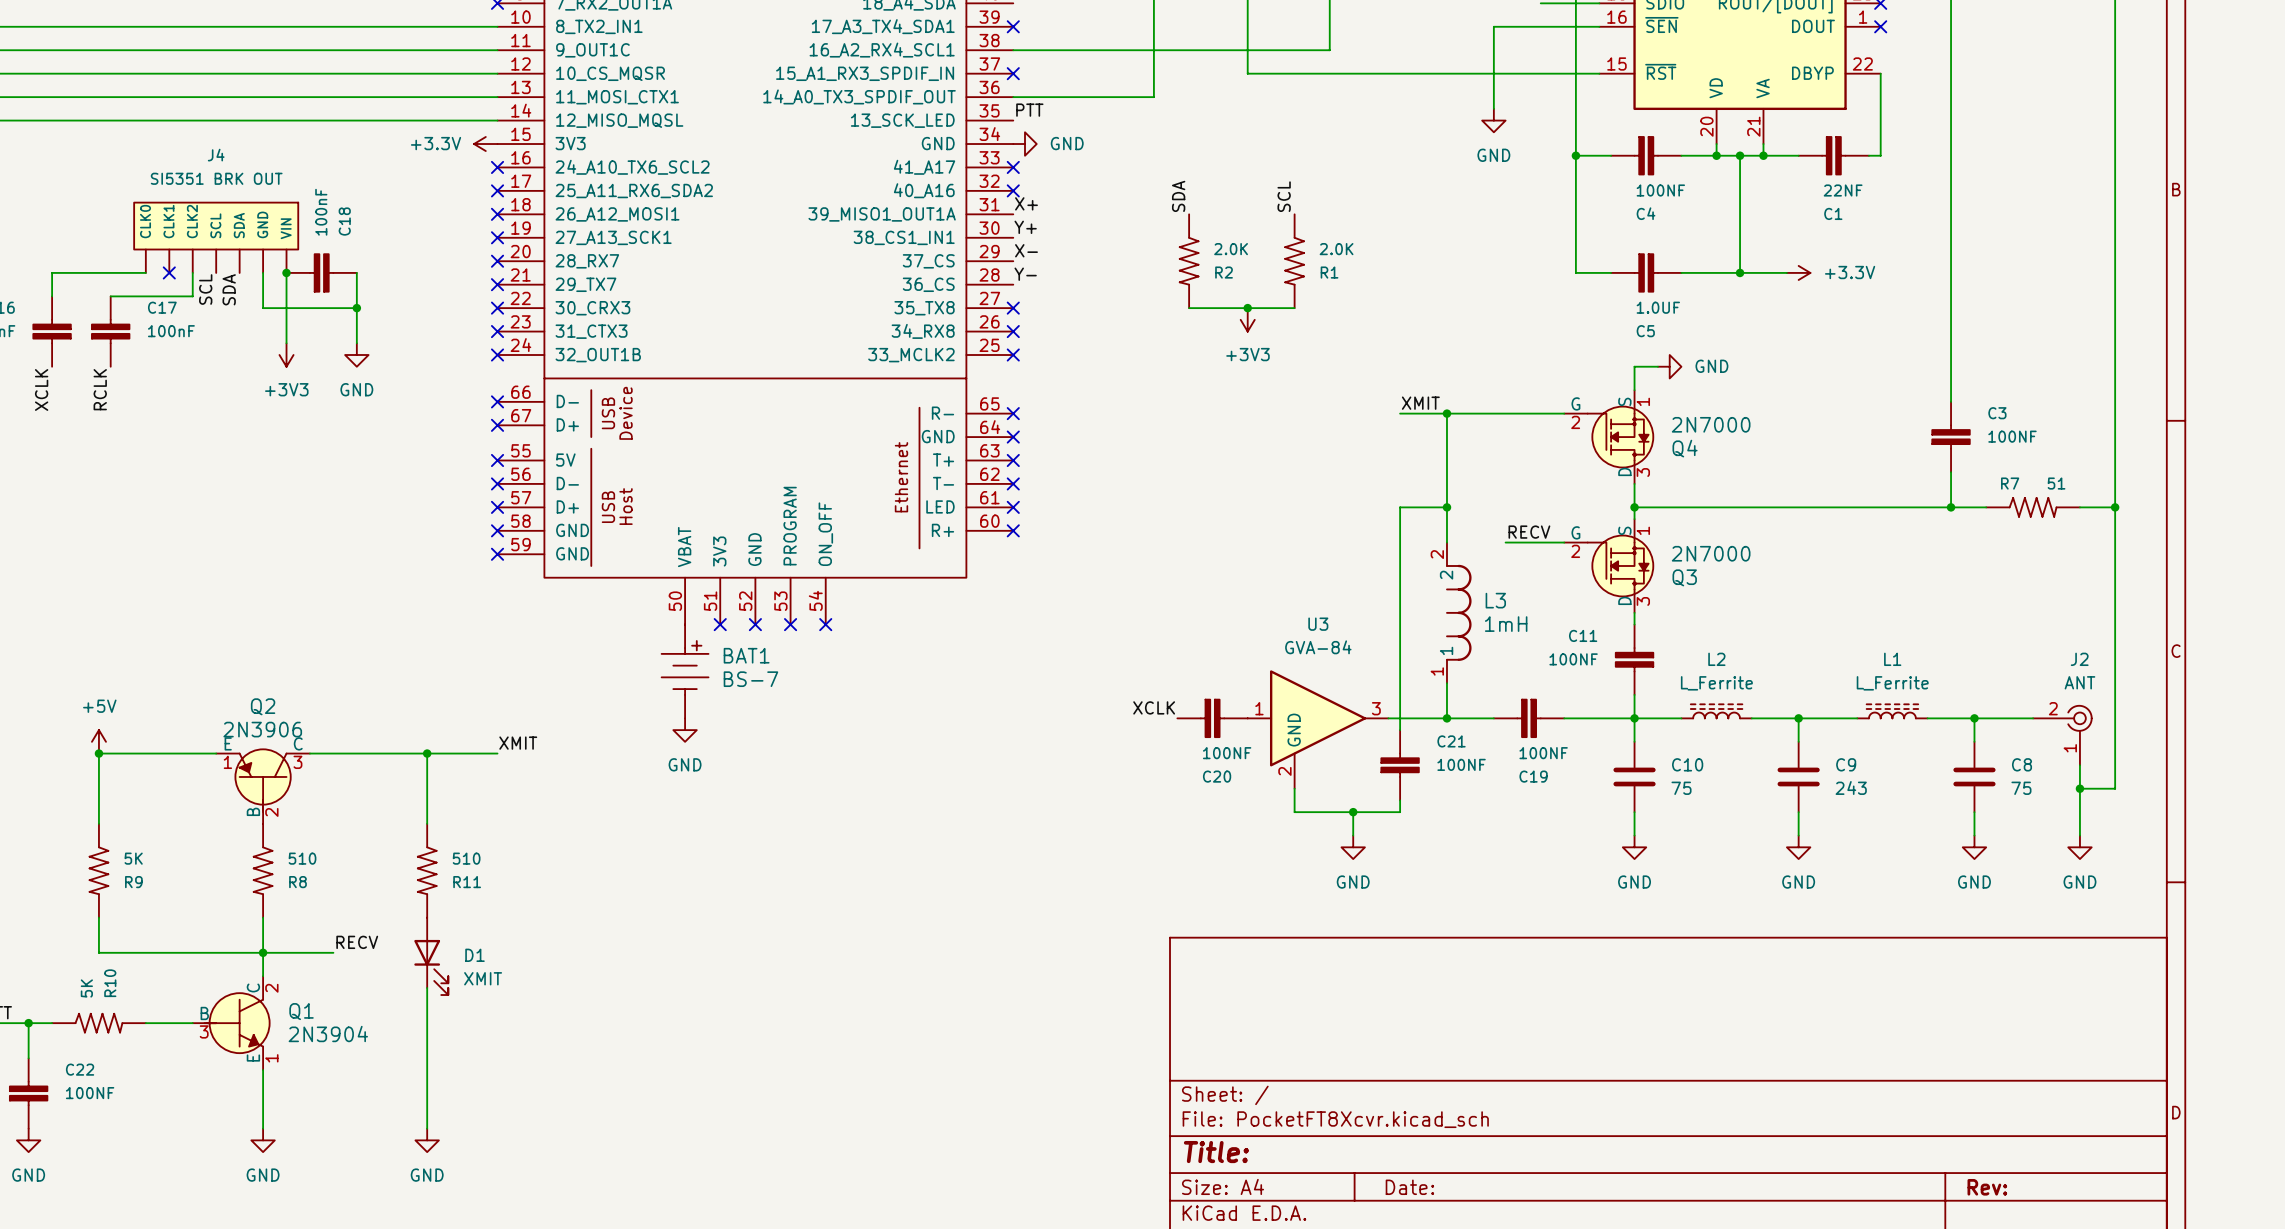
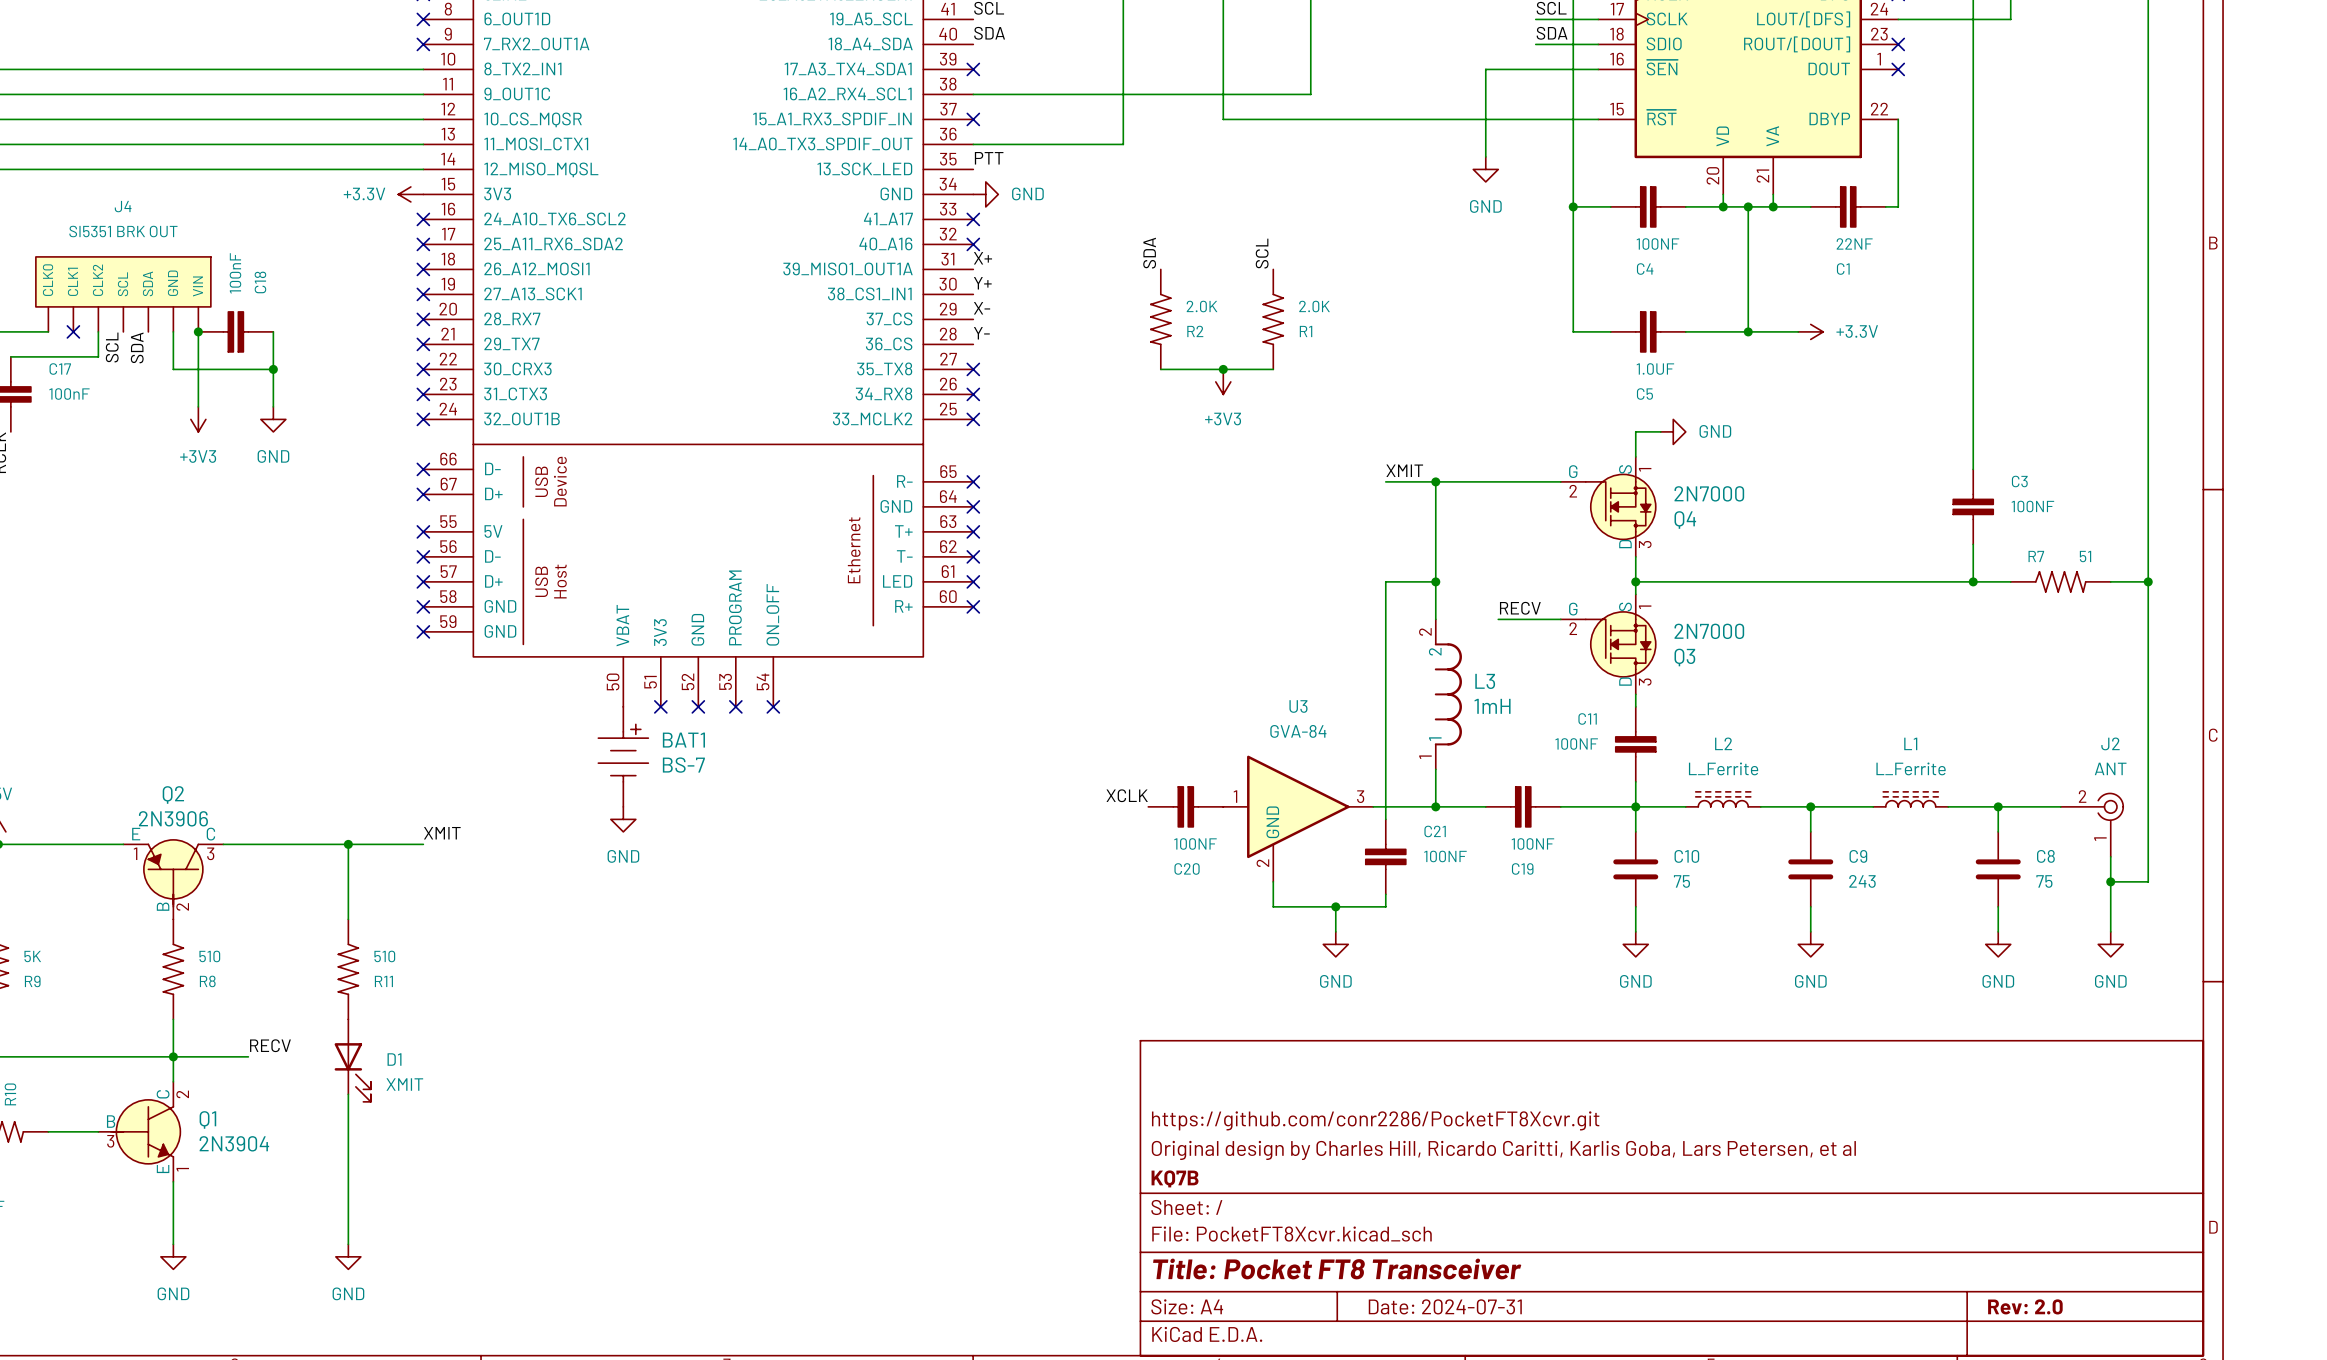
title block: none -> https://github.com/conr2286/PocketFT8Xcvr.git (1375, 1120)
title block: none -> Original design by Charles Hill, Ricardo Caritti, Karlis Goba, Lars Petersen, et al (1503, 1150)
title block: none -> KQ7B (1175, 1178)
title block: Title: (1216, 1152) -> Title: Pocket FT8 Transceiver (1337, 1268)
title block: Date: (1409, 1187) -> Date: 2024-07-31 (1445, 1306)
title block: Rev: (1987, 1187) -> Rev: 2.0 (2025, 1306)

